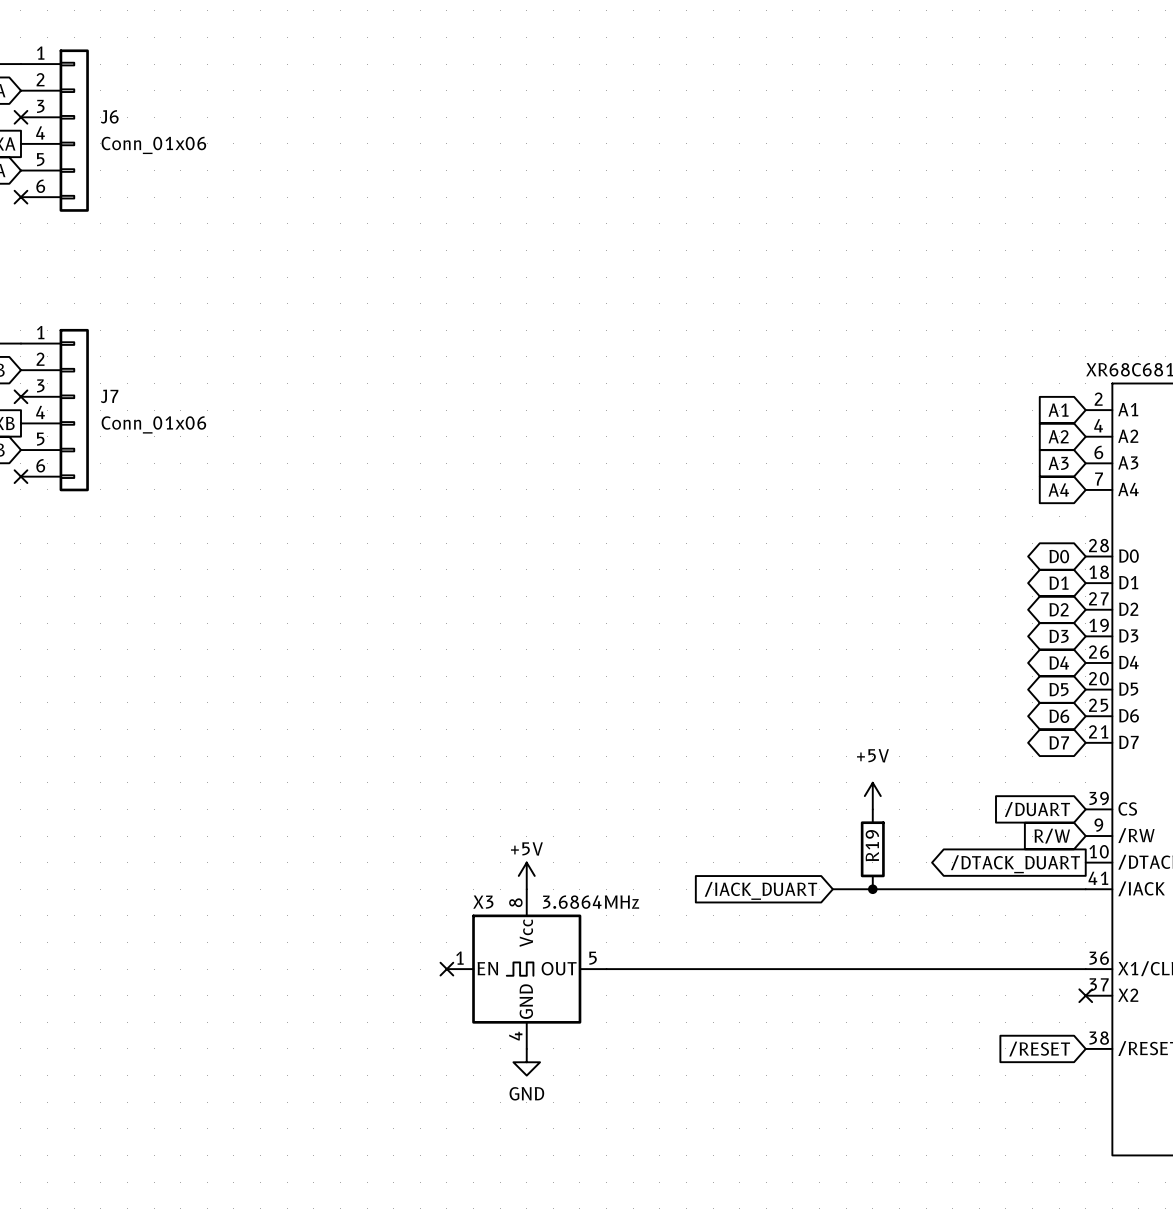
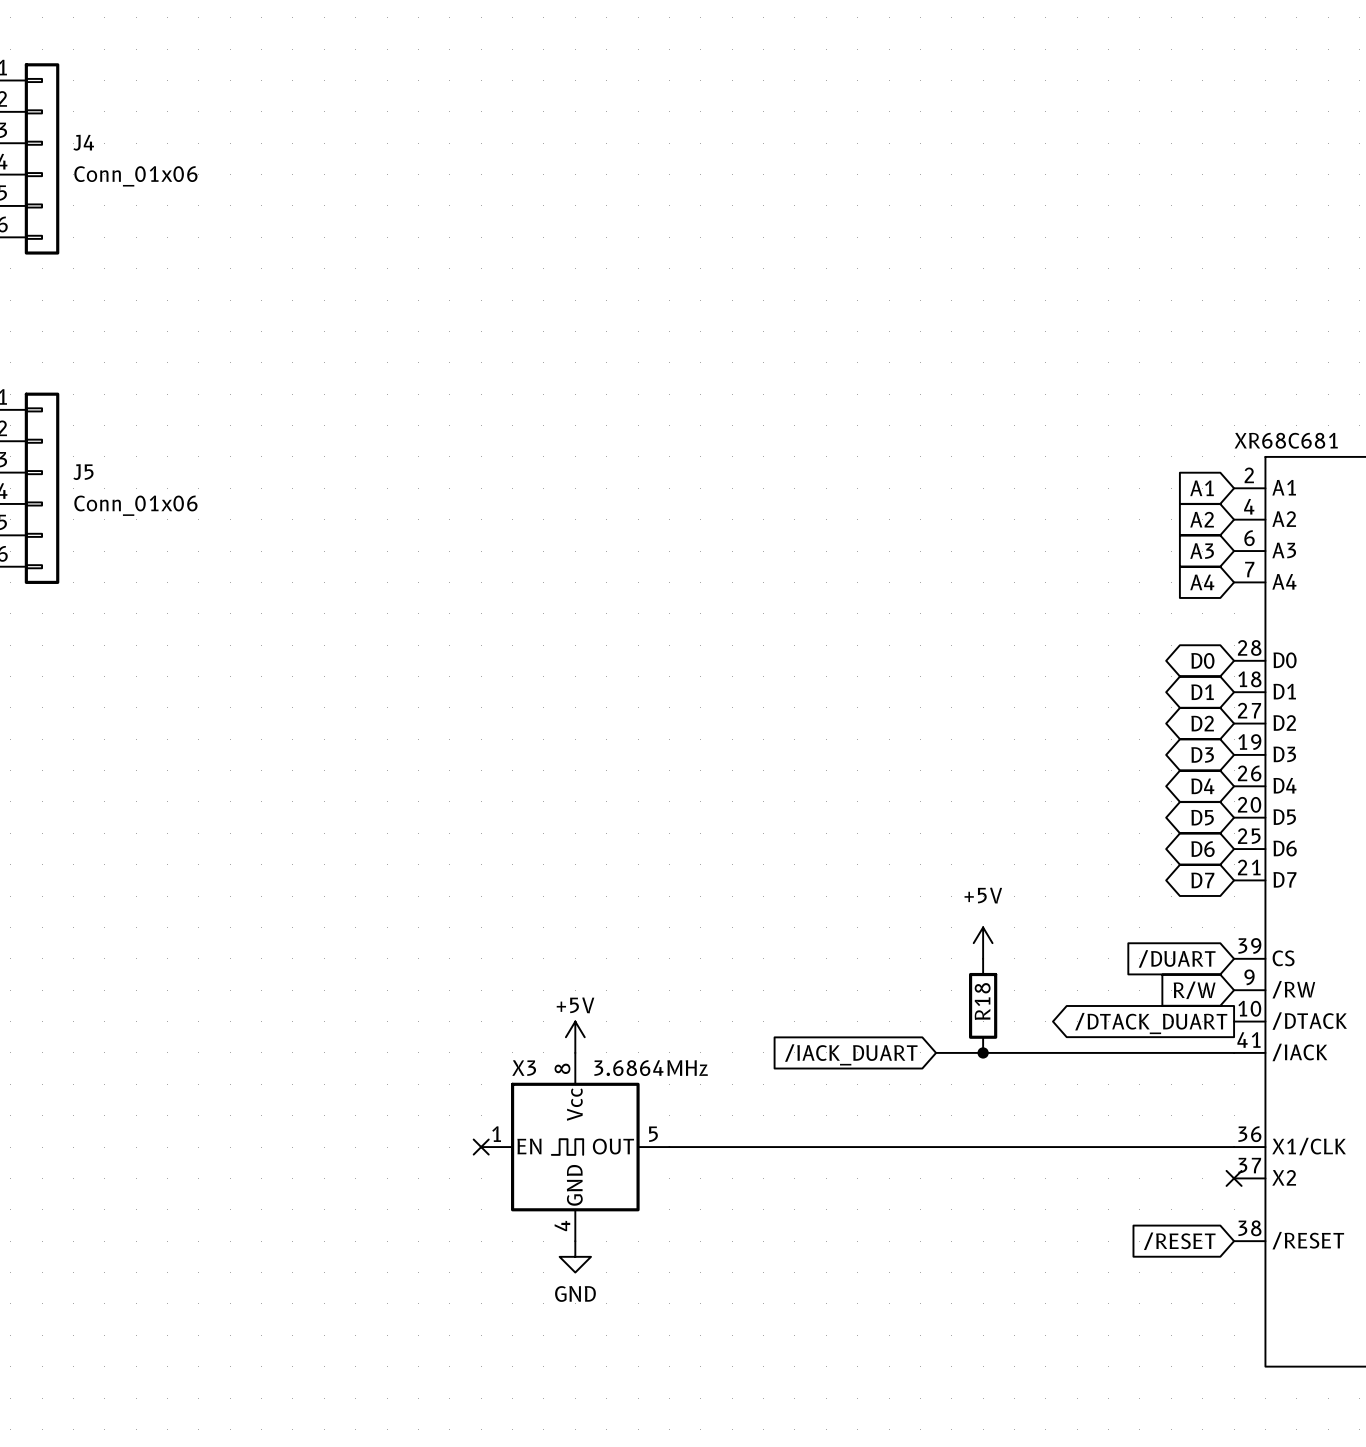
J6 name: J6 (109, 116) -> J4 (83, 142)
J7 name: J7 (109, 396) -> J5 (83, 472)
R19 name: R19 (872, 845) -> R18 (982, 1001)

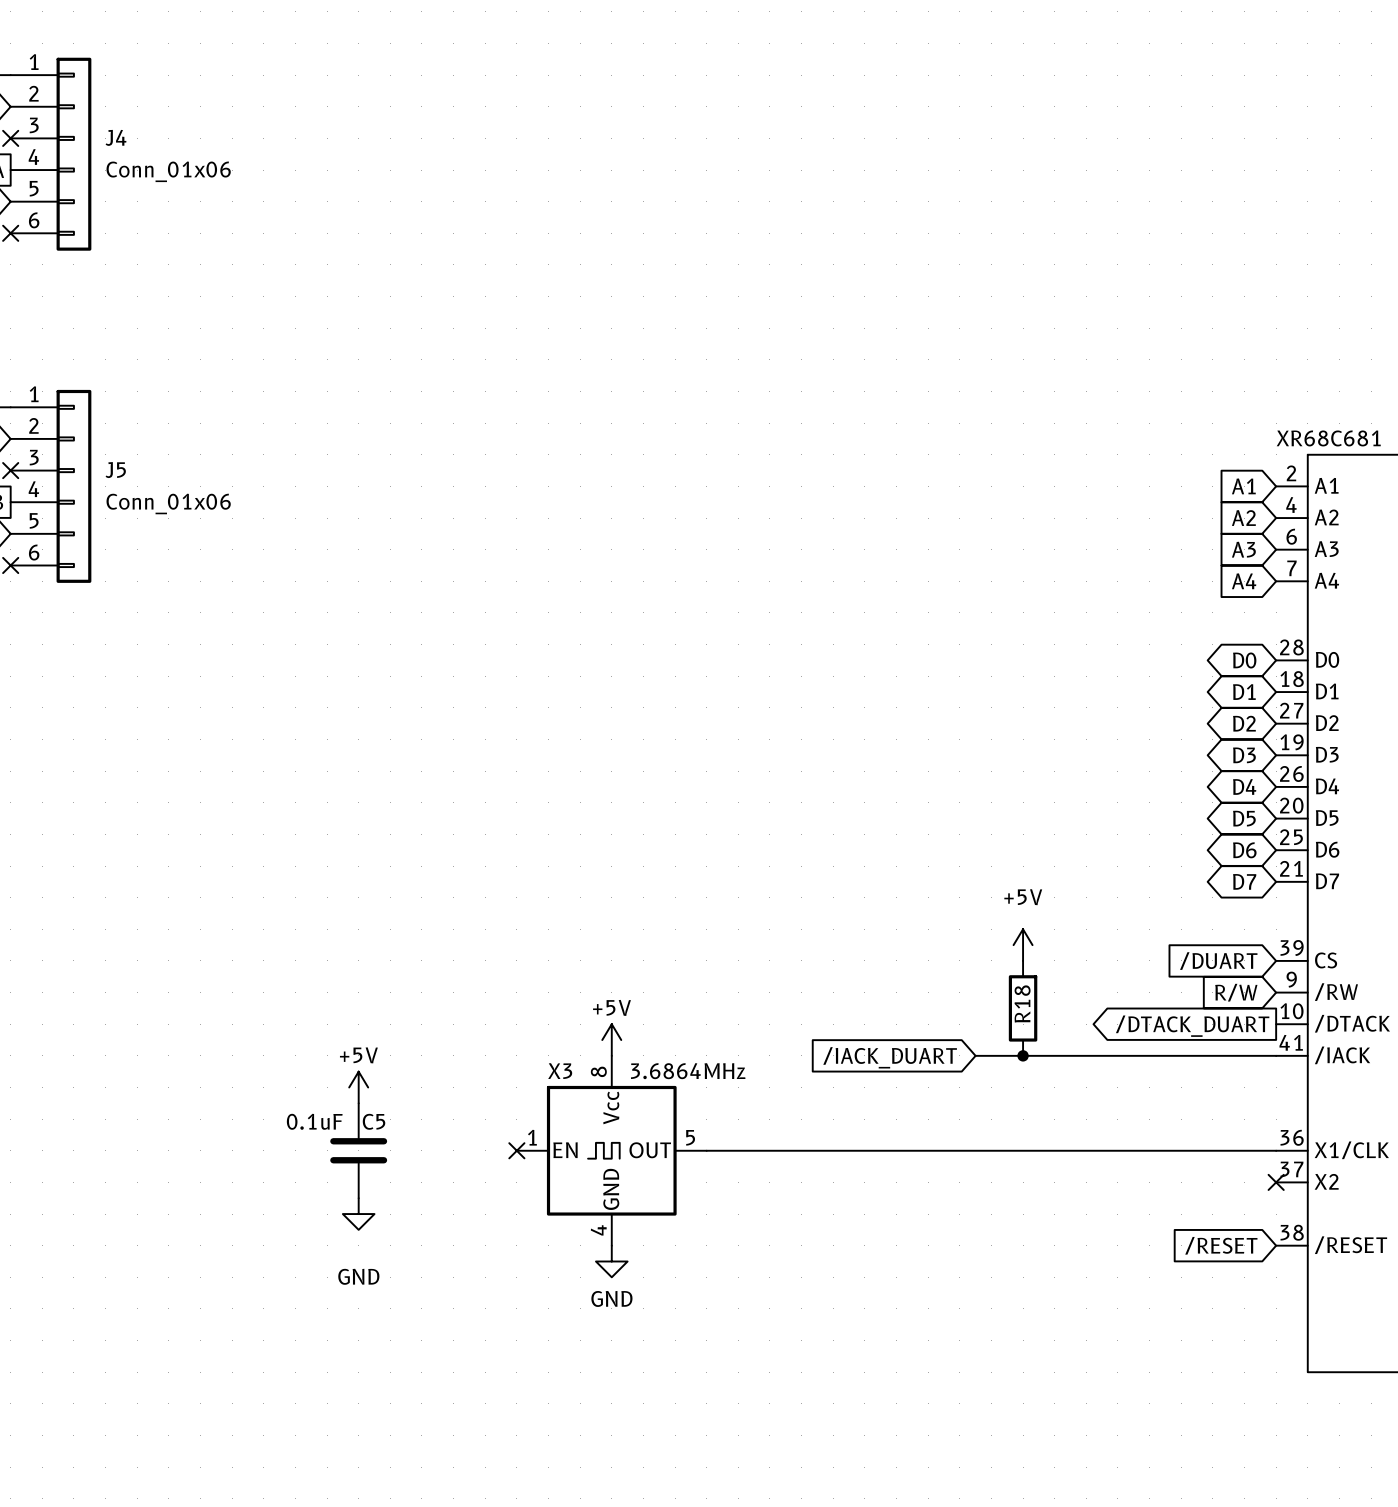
power symbol: none -> +5V (358, 1087)
C5: none -> 0.1uF (358, 1150)
power symbol: none -> GND (358, 1214)

